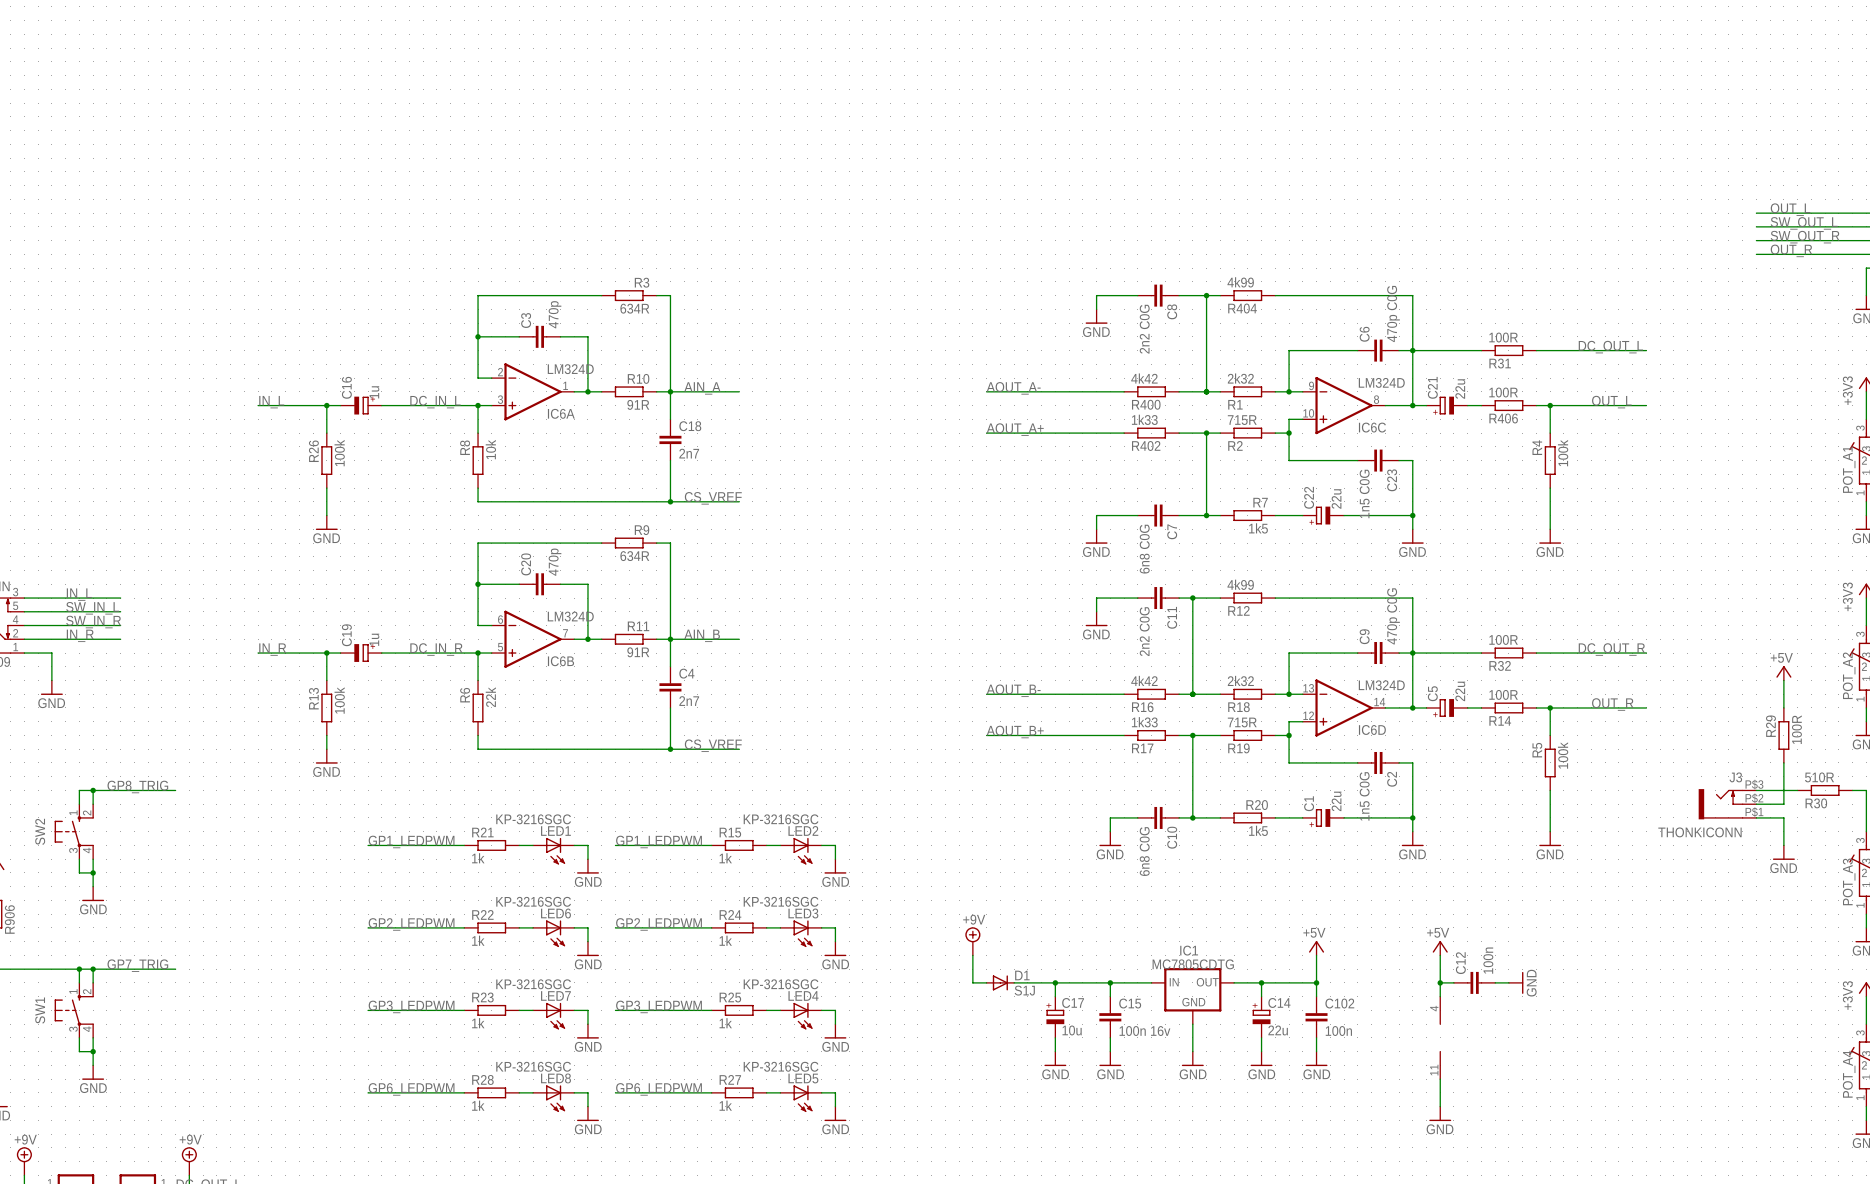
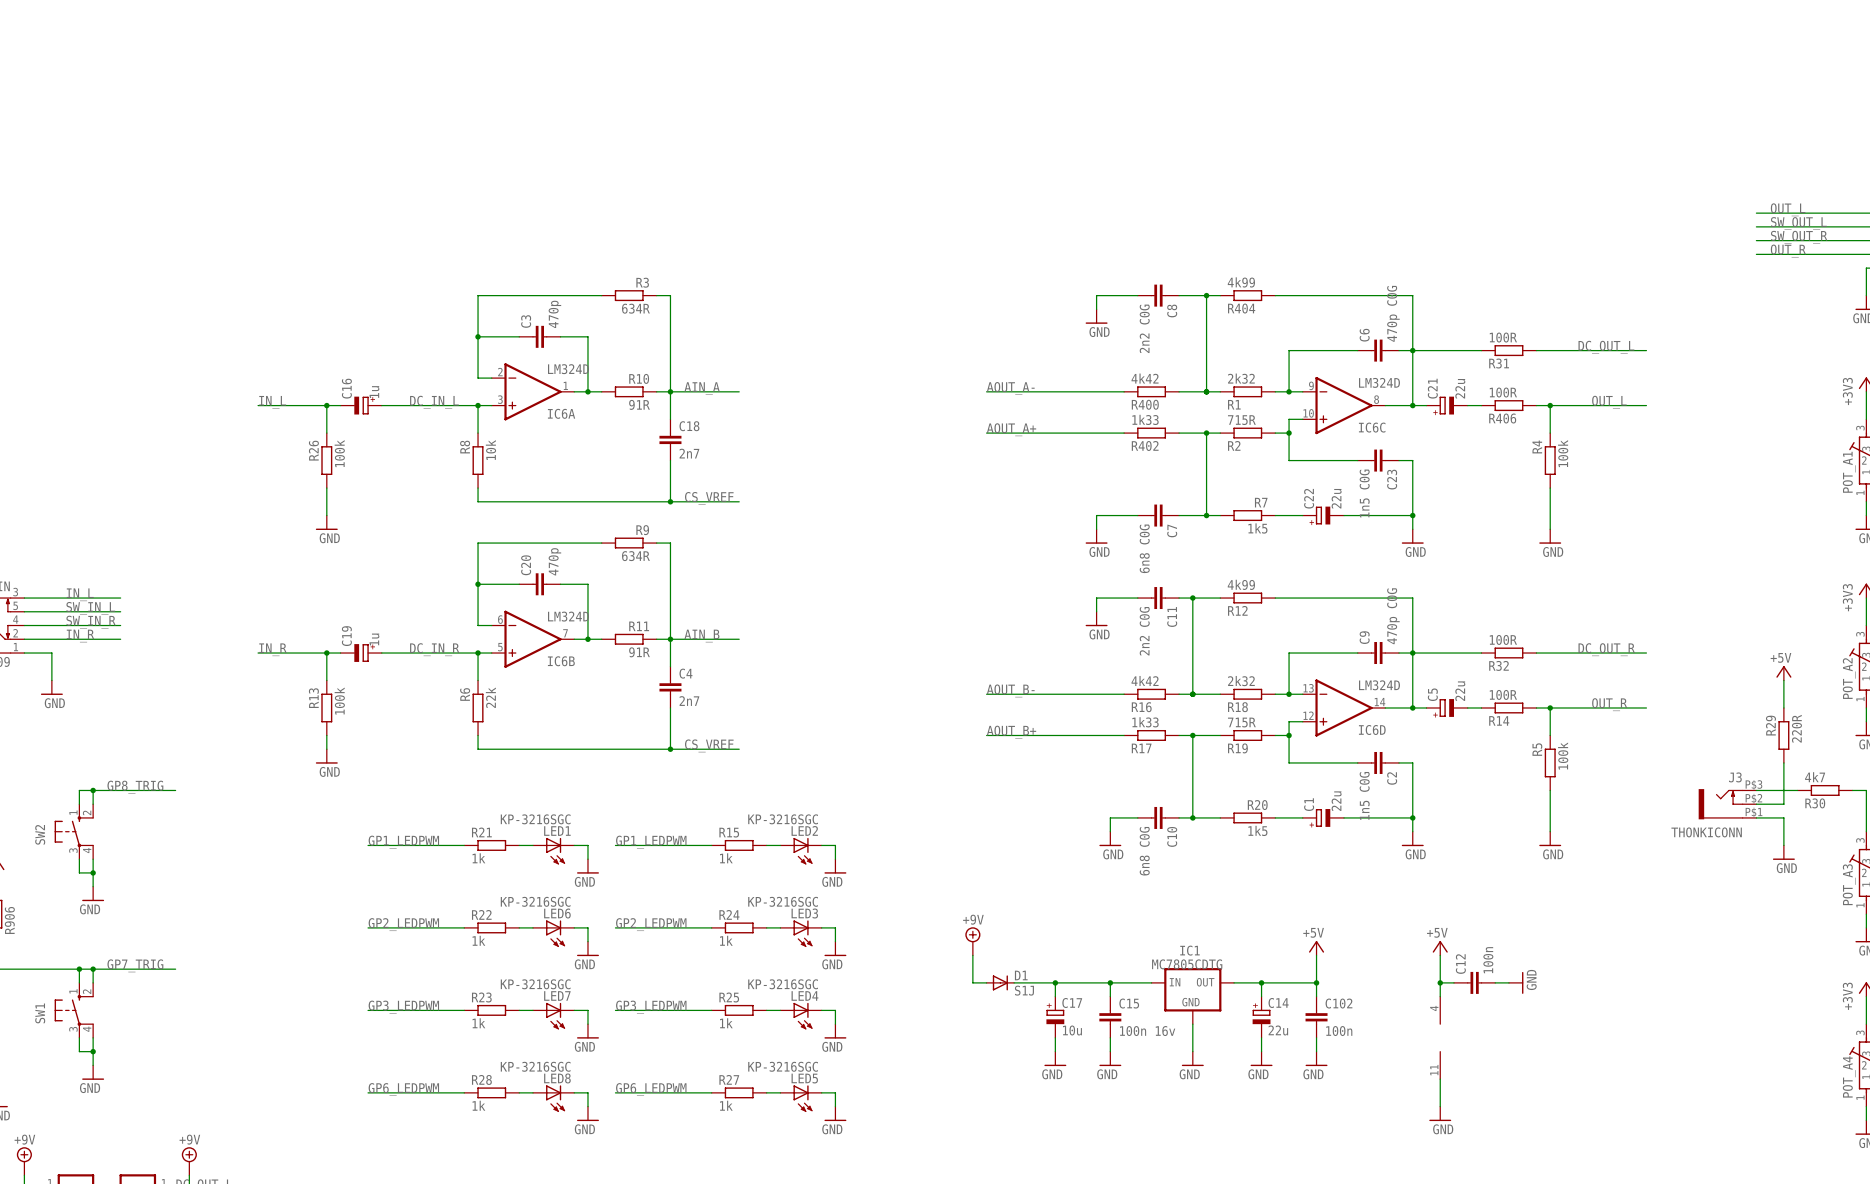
R29 value: 100R (1796, 729) -> 220R (1796, 728)
R30 value: 510R (1819, 777) -> 4k7 (1815, 777)

